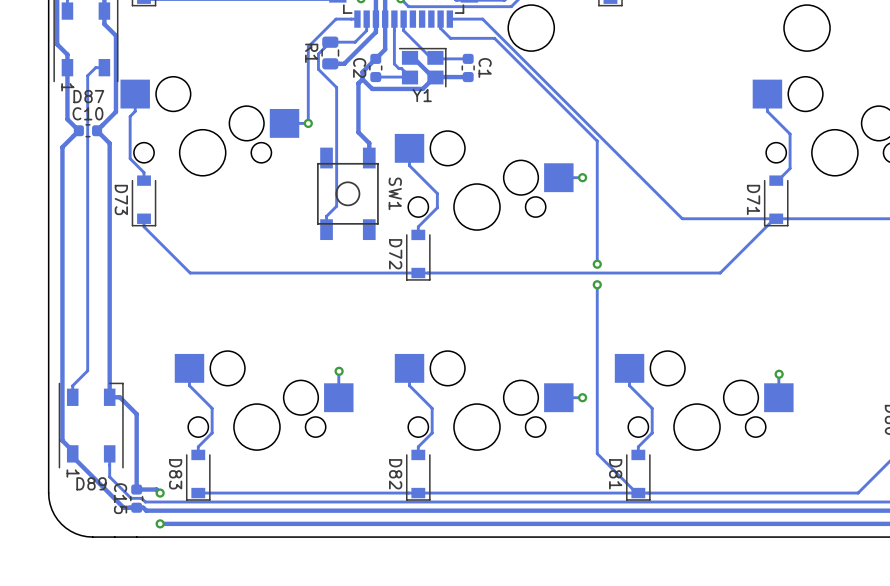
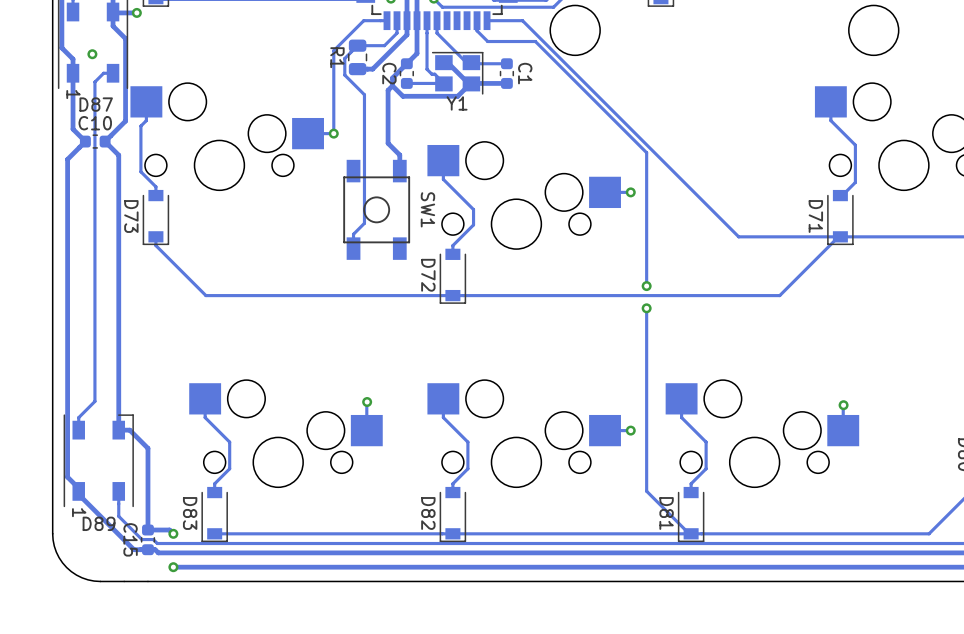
track: none -> (113, 11) (136, 12)
via: none -> (136, 12)
via: none -> (92, 54)

